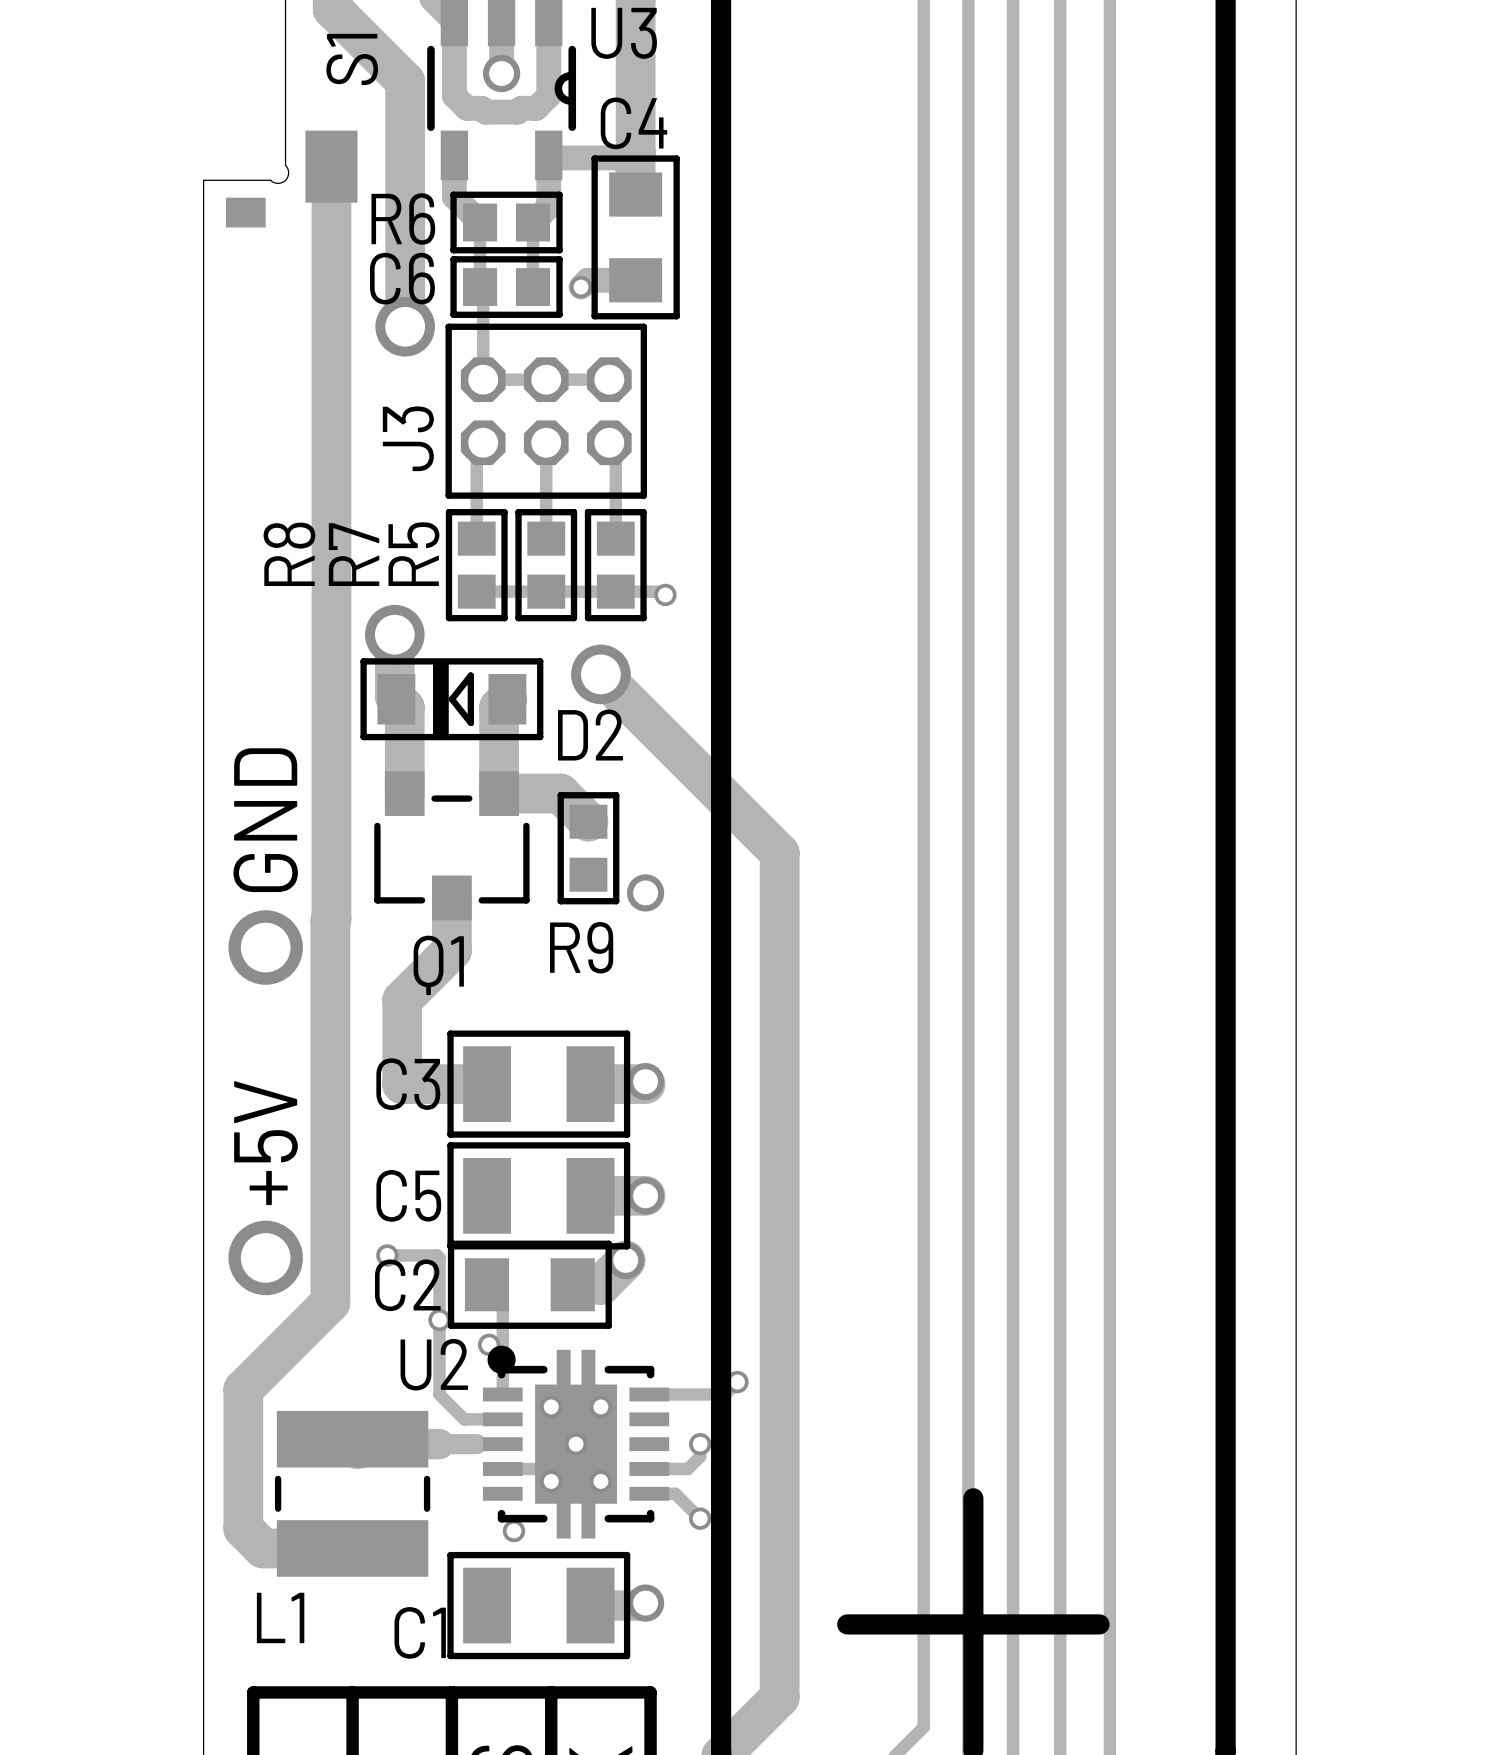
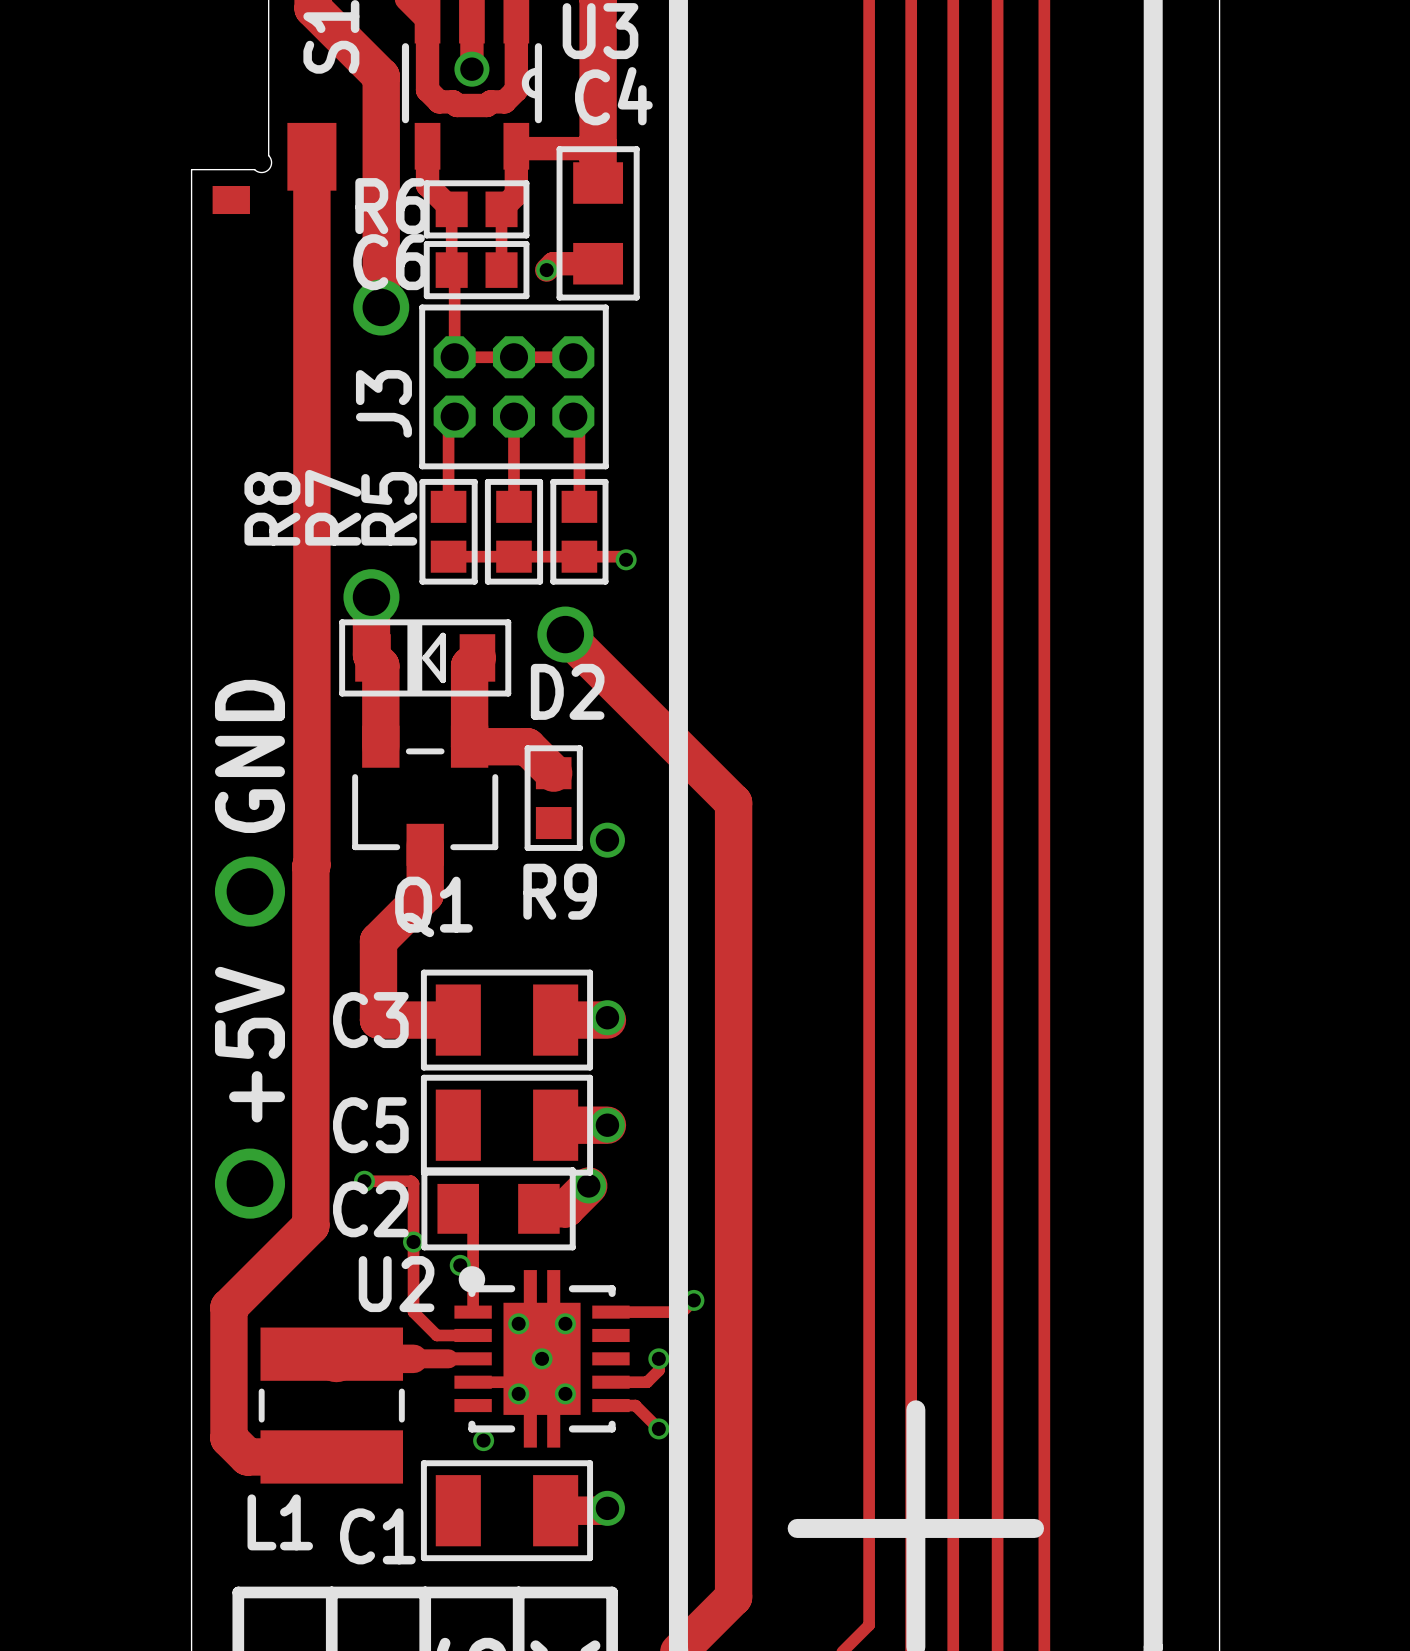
C4 name position: C4 (633, 123) -> C4 (613, 96)

